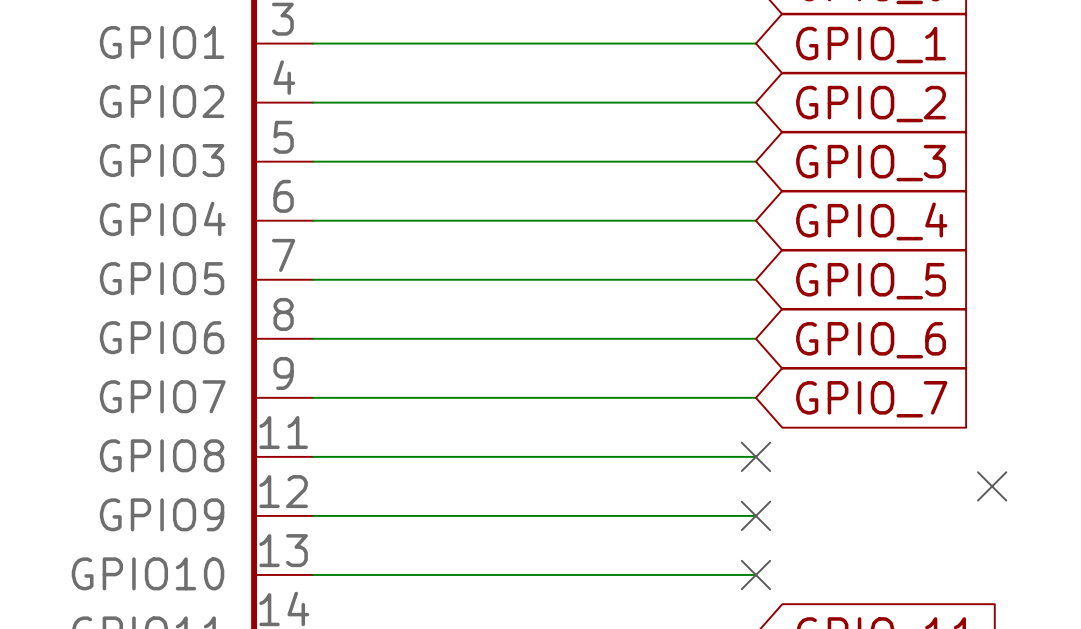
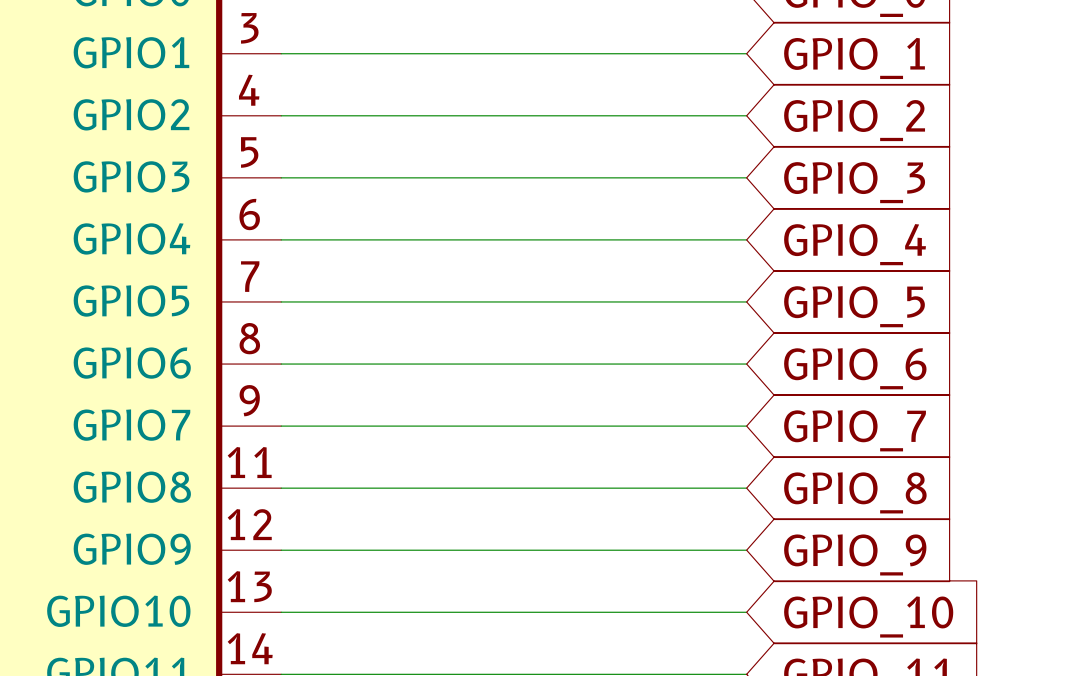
no-connect mark: (755, 456) -> none
global label: none -> GPIO_8 (855, 492)
no-connect mark: (992, 486) -> none
no-connect mark: (755, 515) -> none
global label: none -> GPIO_9 (855, 554)
no-connect mark: (755, 574) -> none
global label: none -> GPIO_10 (868, 617)

